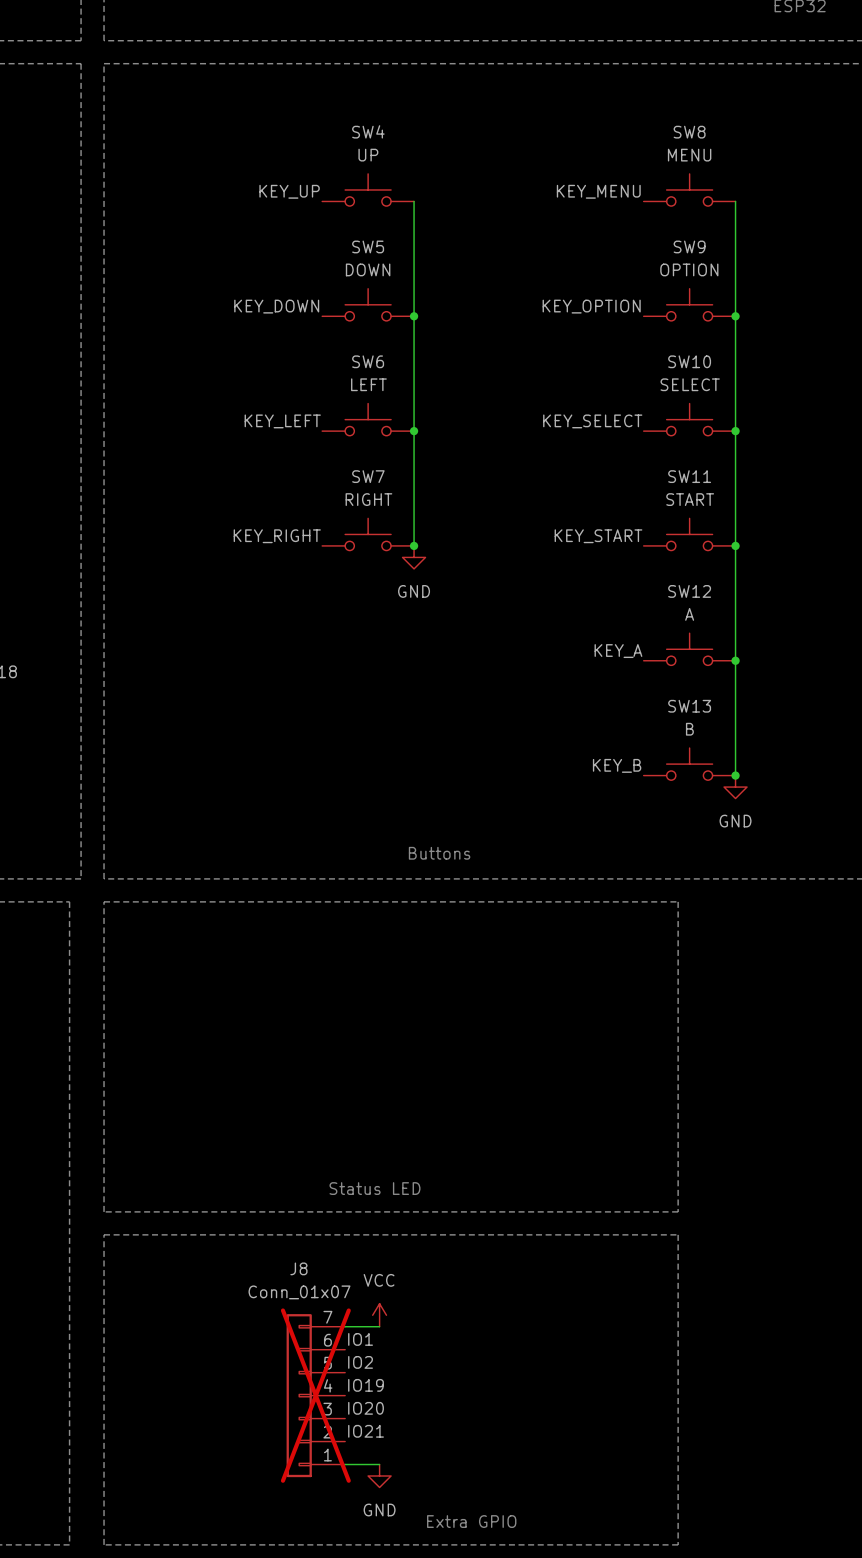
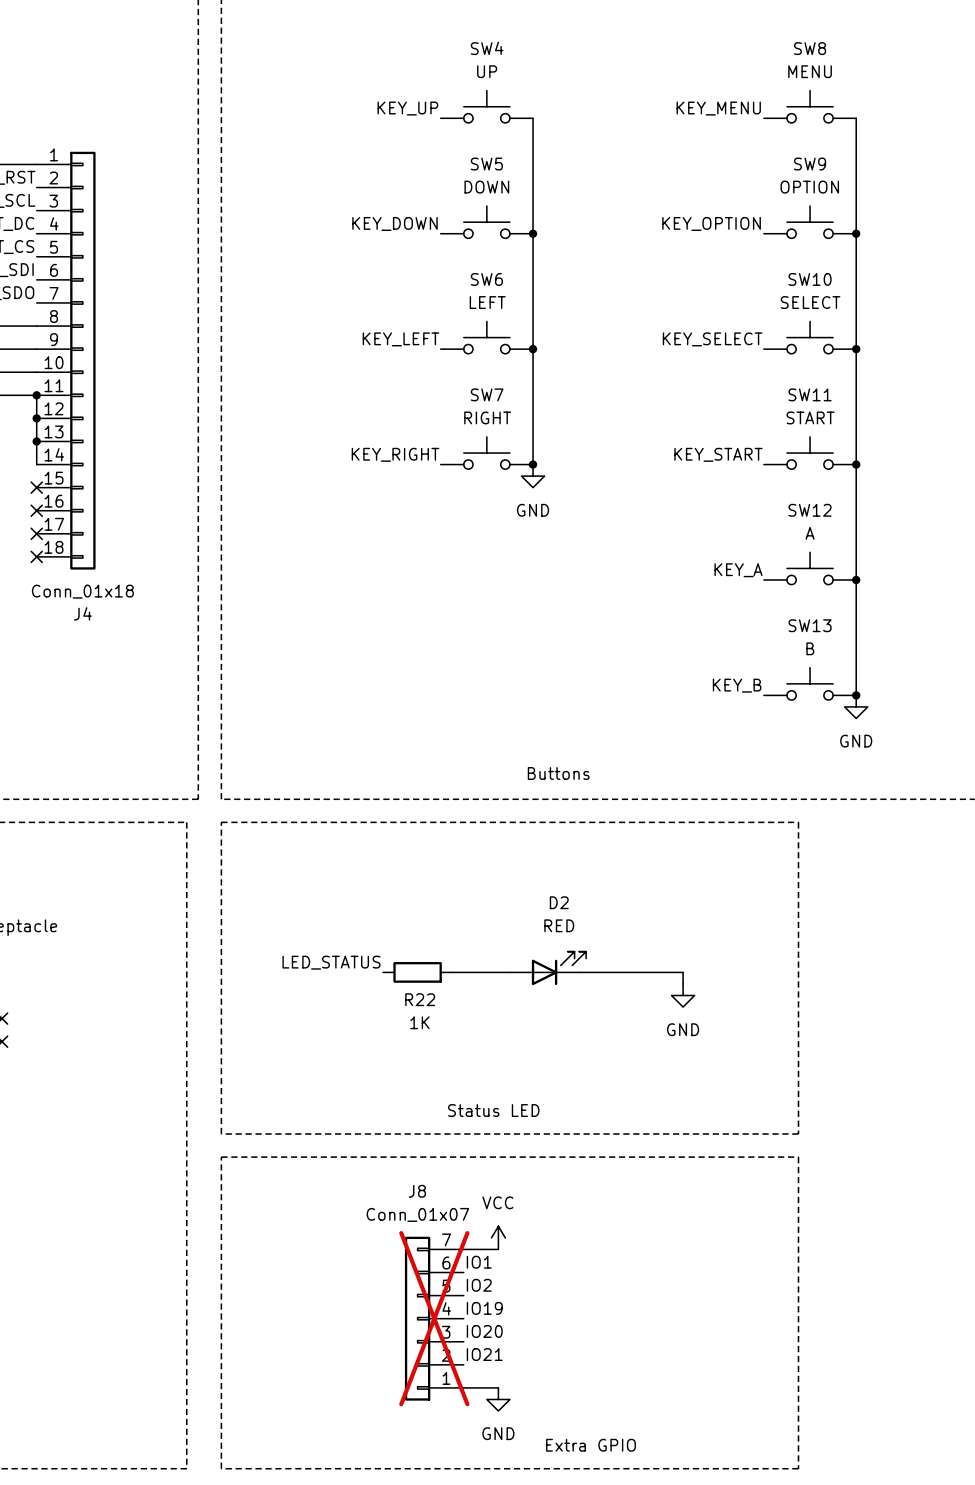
label: none -> LED_STATUS (331, 962)
D2: none -> RED (548, 968)
R22: none -> 1K (417, 972)
wire: none -> (452, 972) (509, 972)
wire: none -> (579, 972) (683, 972) (683, 983)
power symbol: none -> GND (683, 995)

